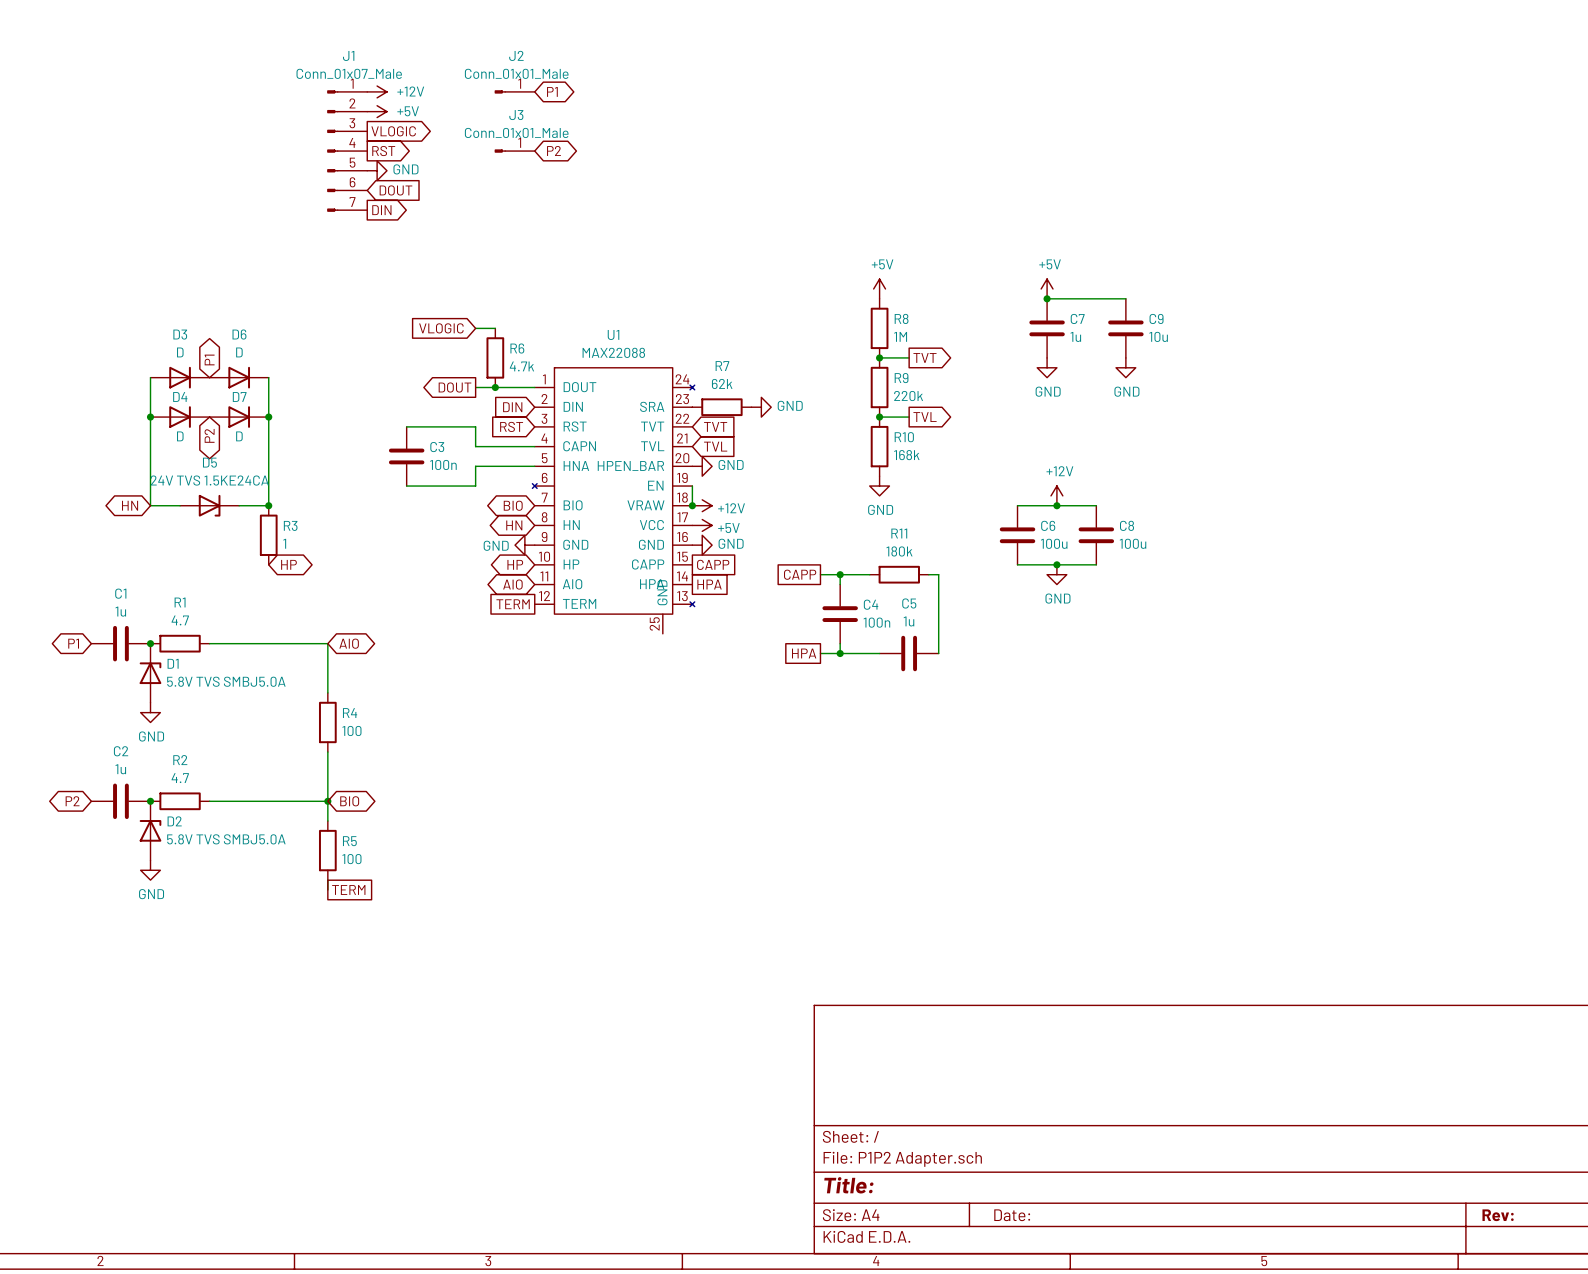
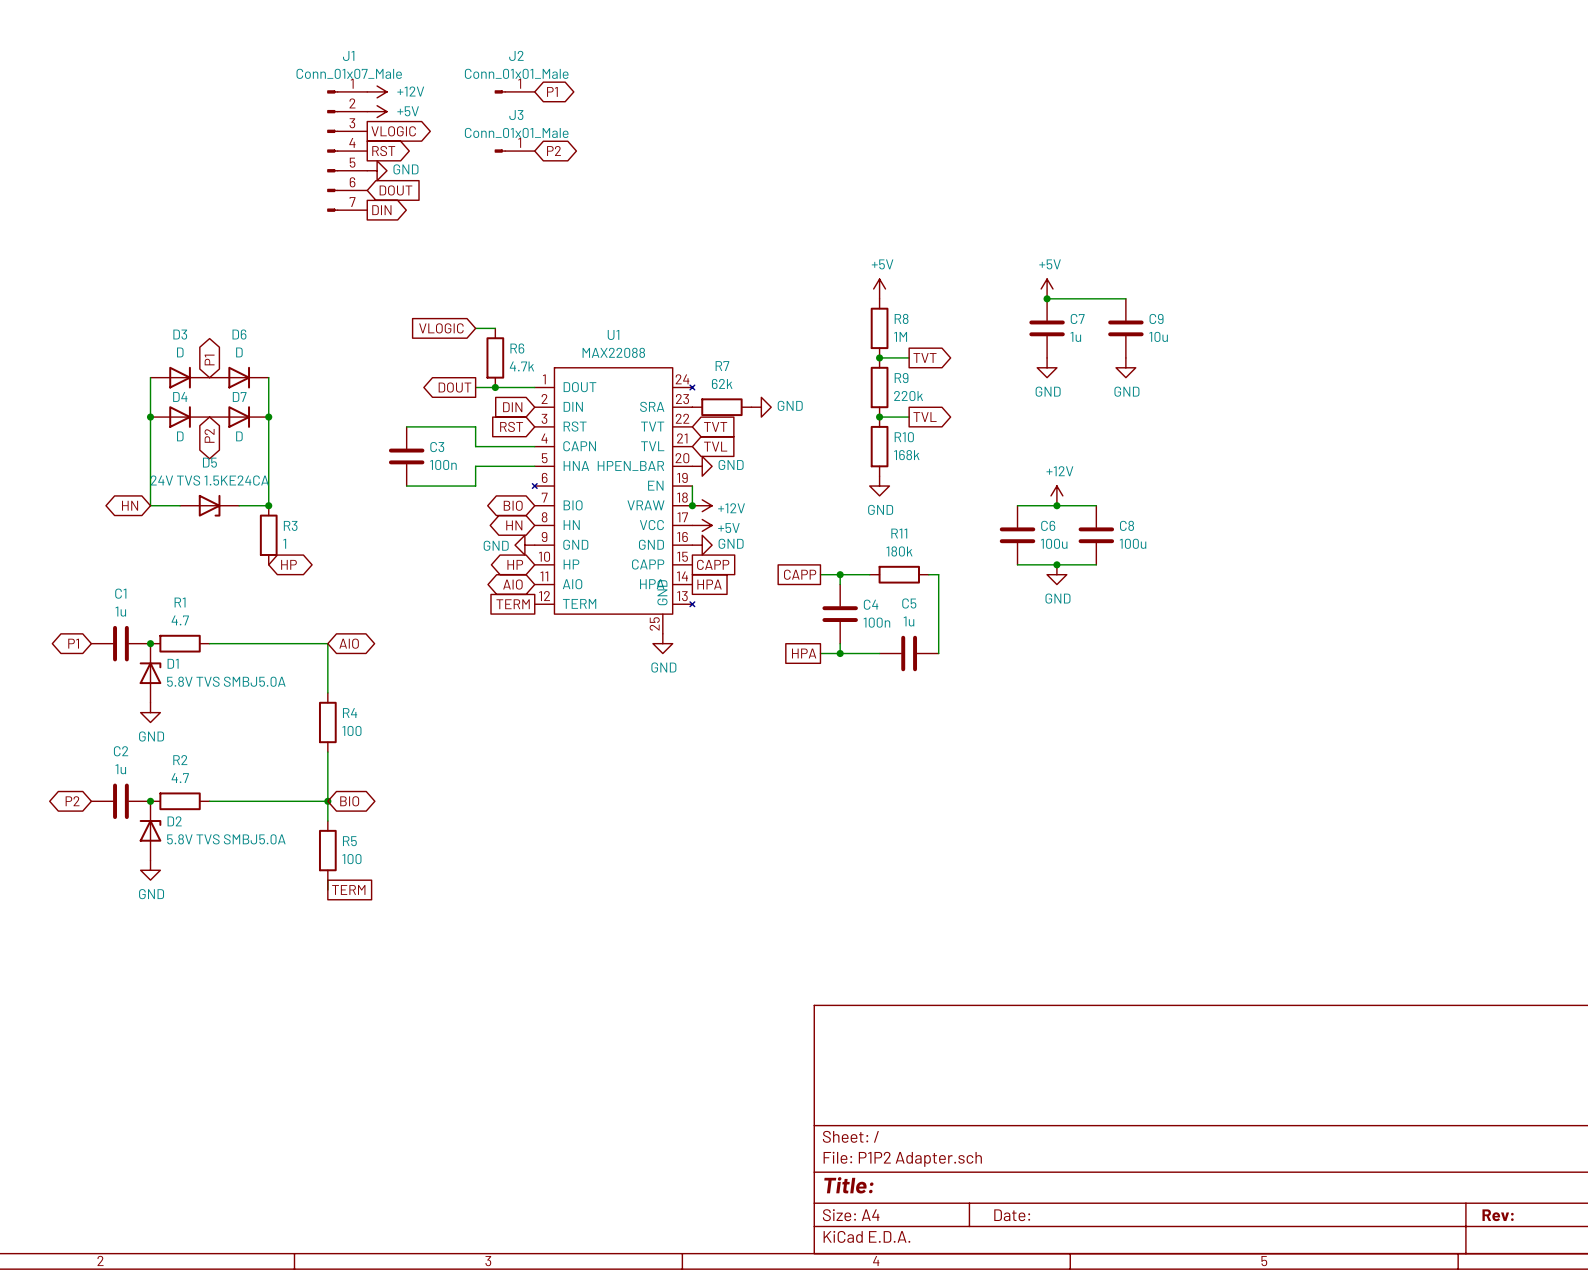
power symbol: none -> GND (662, 643)

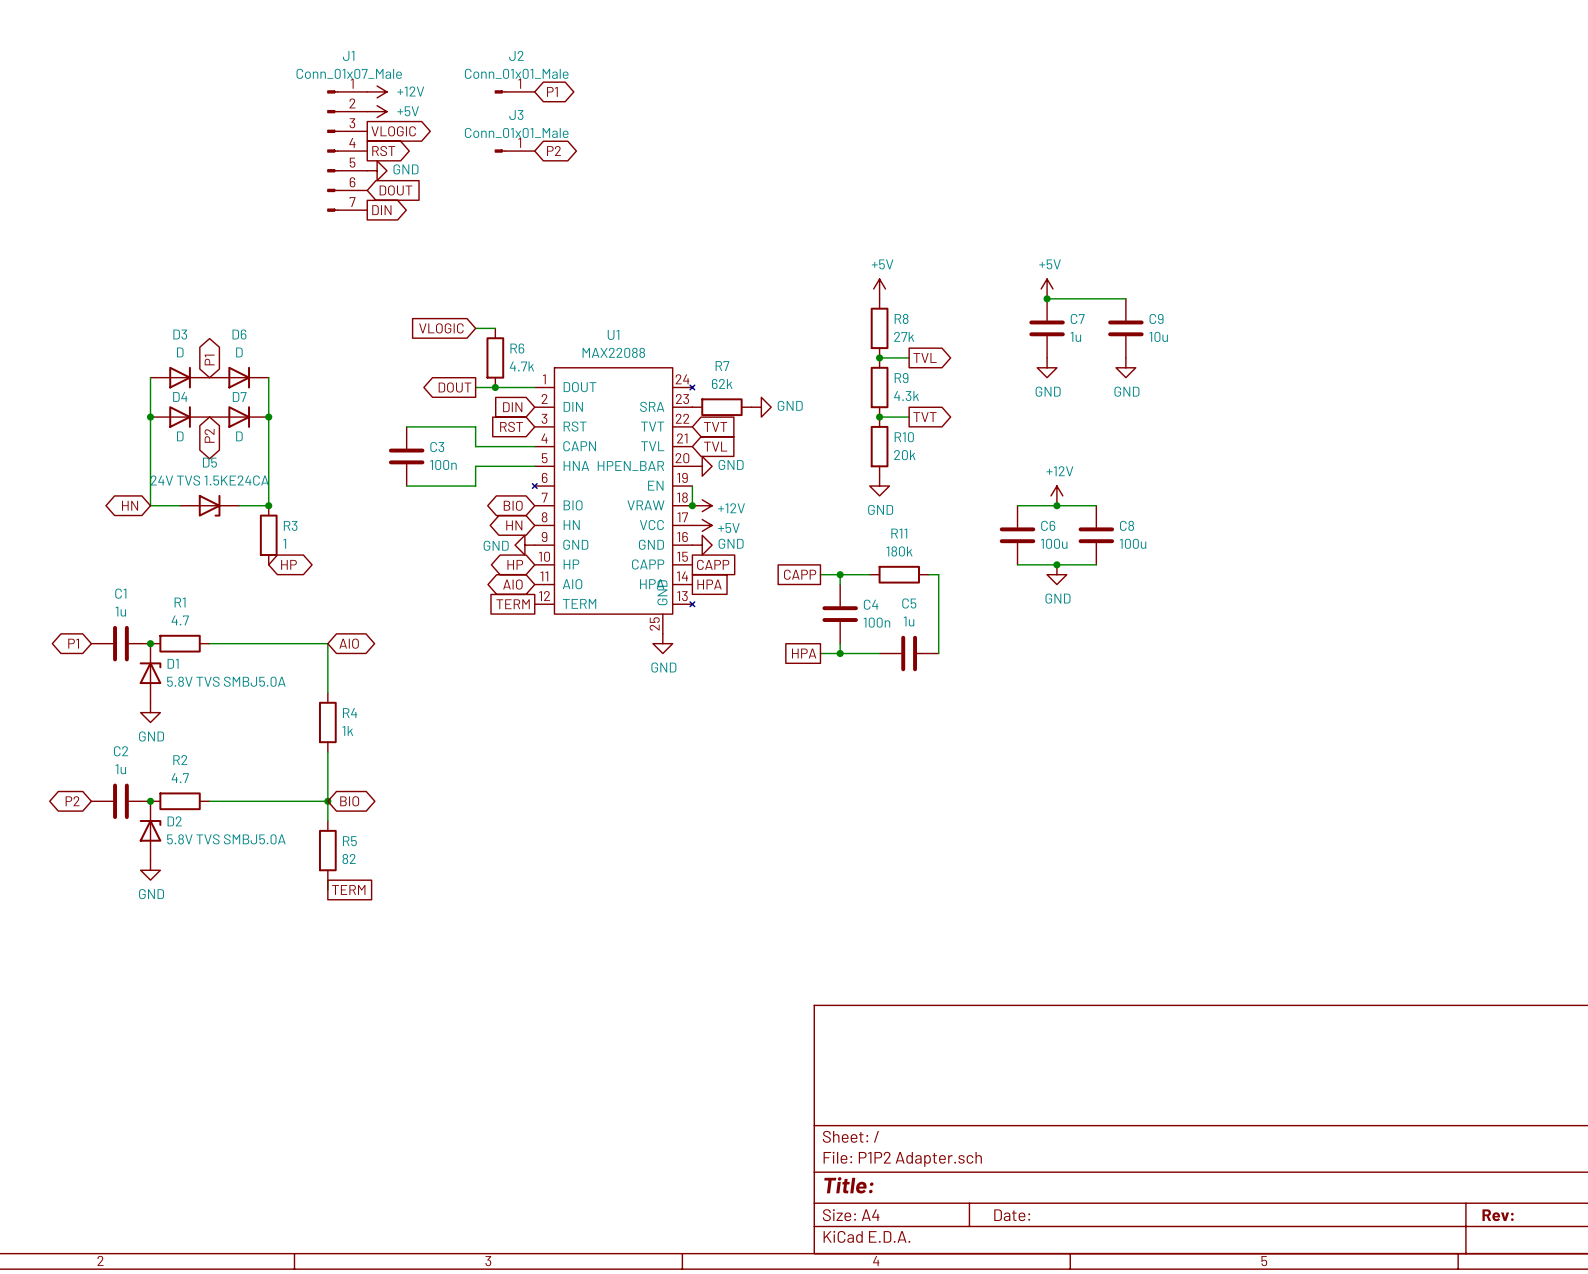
R8 value: 1M (900, 336) -> 27k (904, 336)
global label: TVT (924, 357) -> TVL (925, 357)
R9 value: 220k (908, 396) -> 4.3k (906, 396)
global label: TVL (925, 417) -> TVT (924, 417)
R10 value: 168k (906, 455) -> 20k (904, 455)
R4 value: 100 (351, 730) -> 1k (347, 730)
R5 value: 100 (351, 859) -> 82 (349, 859)

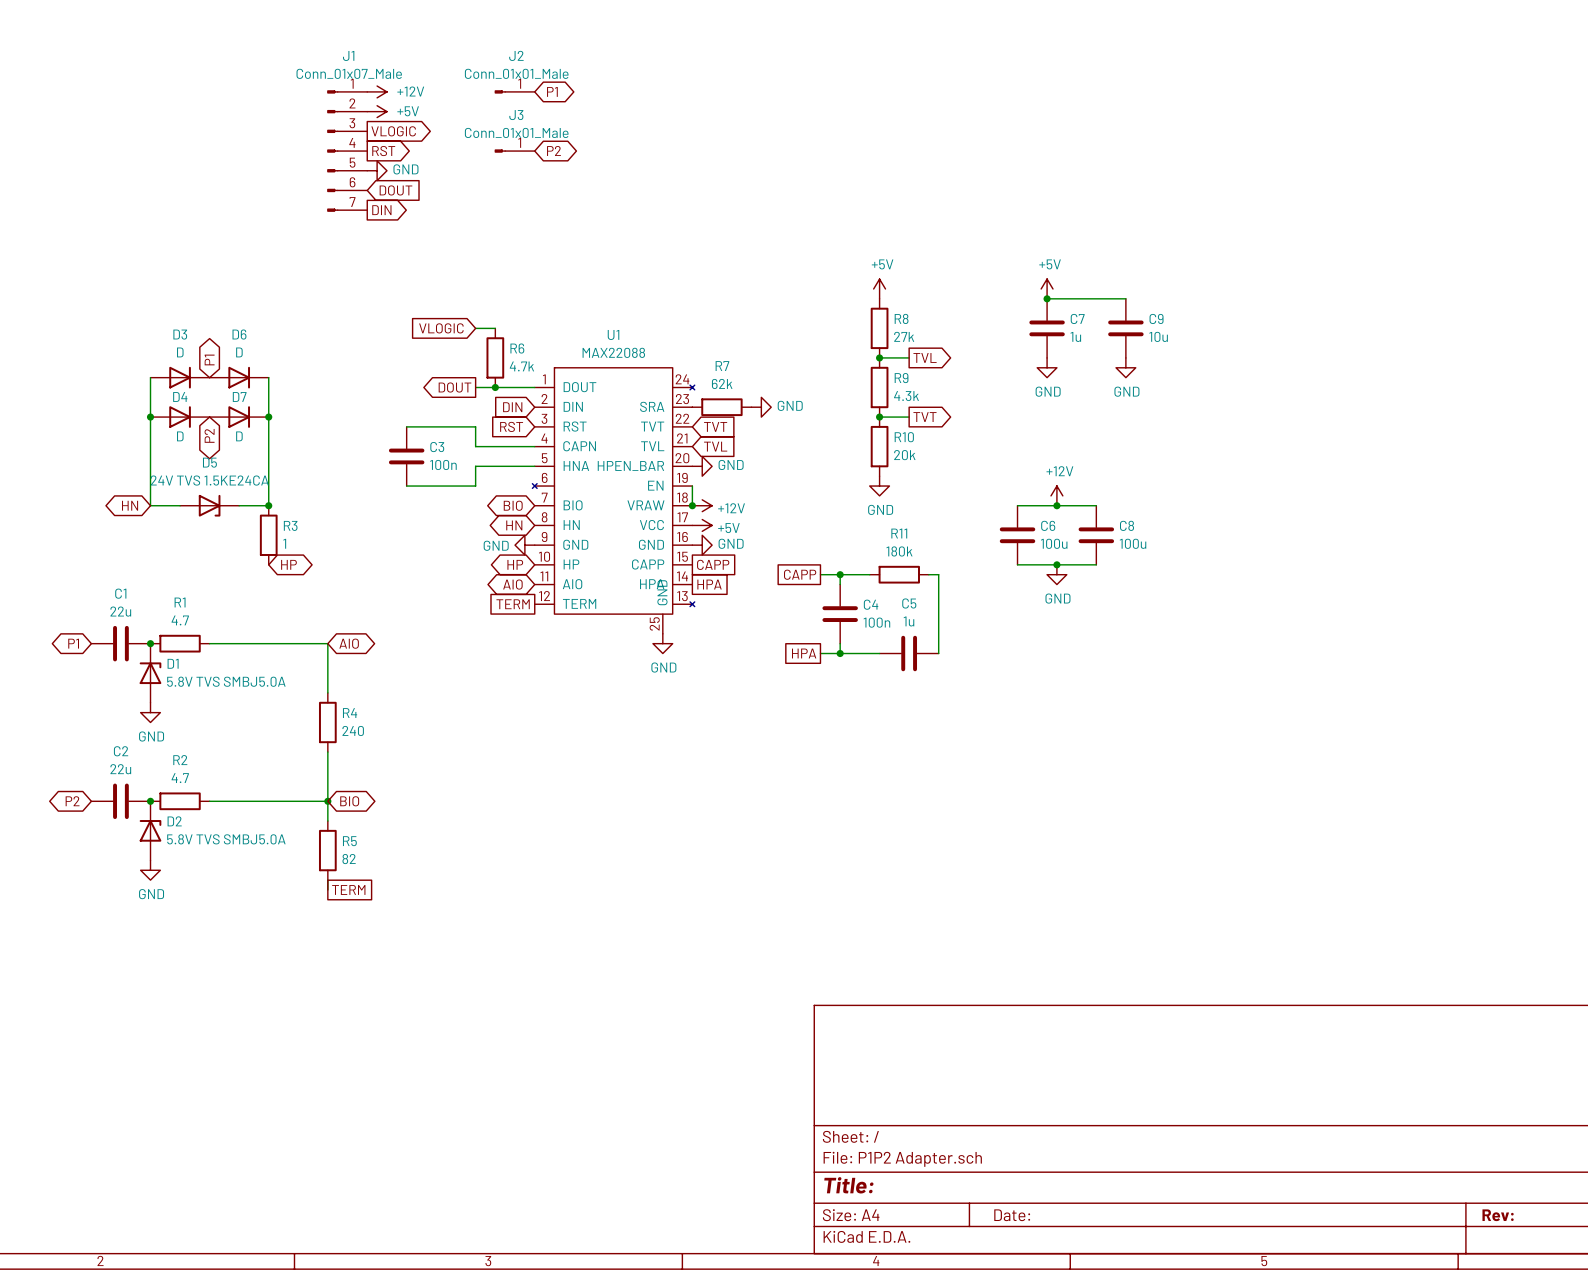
C1 value: 1u (120, 611) -> 22u (120, 611)
R4 value: 1k (347, 730) -> 240 (353, 730)
C2 value: 1u (120, 769) -> 22u (120, 769)

